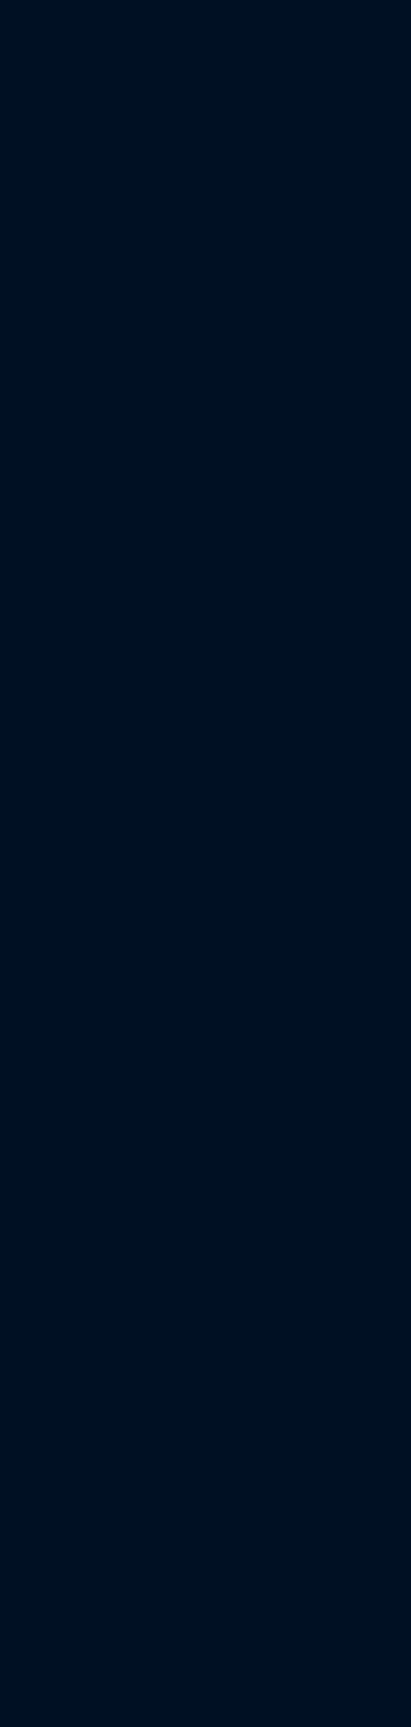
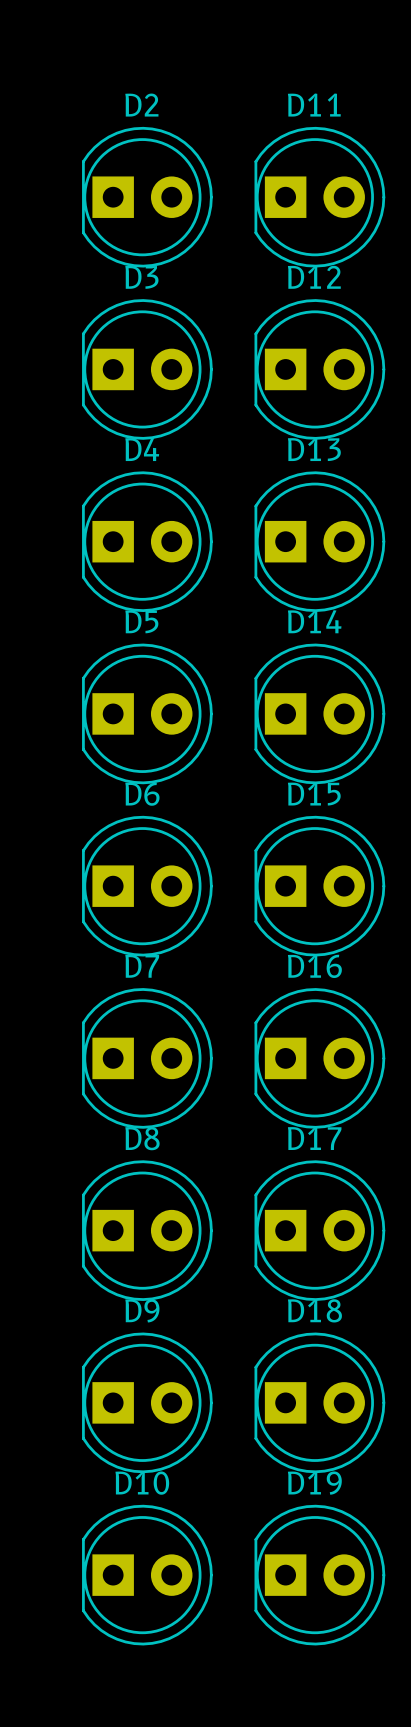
D2: none -> (147, 197)
D11: none -> (319, 197)
D3: none -> (147, 369)
D12: none -> (319, 369)
D4: none -> (147, 541)
D13: none -> (319, 541)
D5: none -> (147, 713)
D14: none -> (319, 713)
D6: none -> (147, 886)
D15: none -> (319, 886)
D7: none -> (147, 1058)
D16: none -> (319, 1058)
D8: none -> (147, 1230)
D17: none -> (319, 1230)
D9: none -> (147, 1402)
D18: none -> (319, 1402)
D10: none -> (147, 1575)
D19: none -> (319, 1575)

